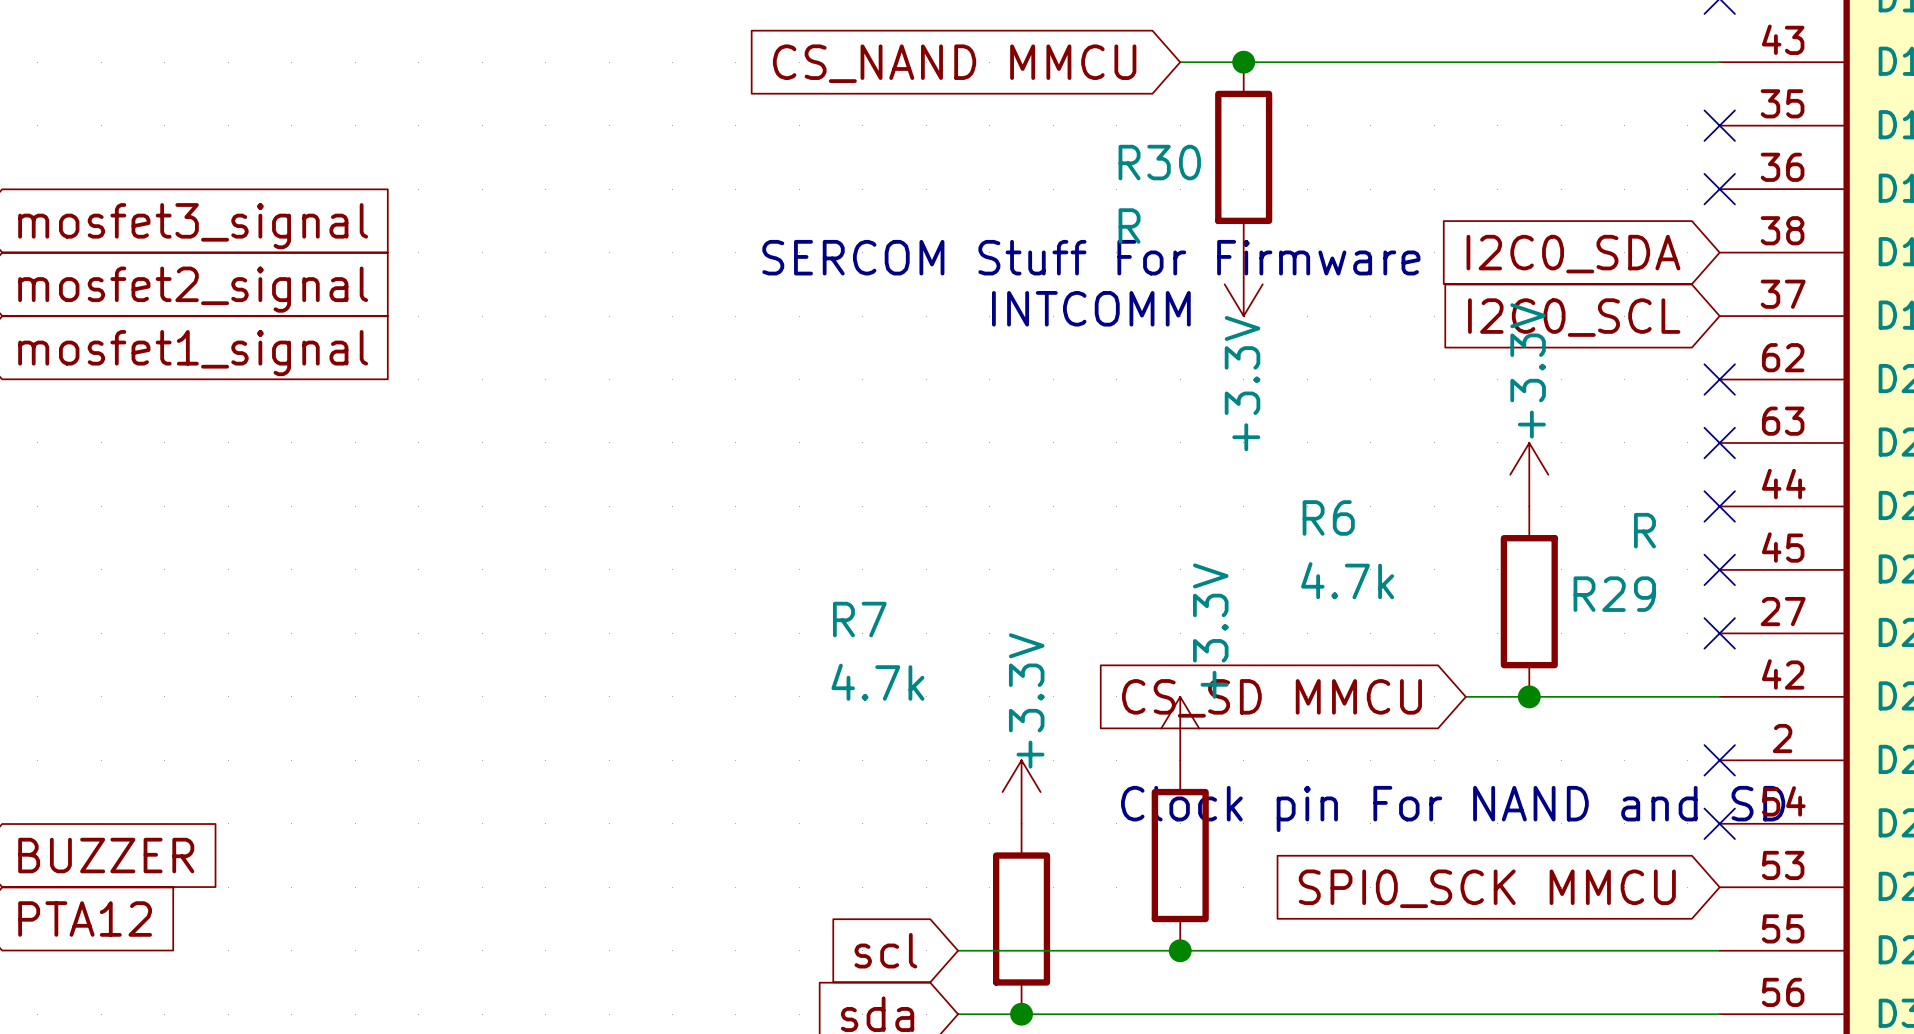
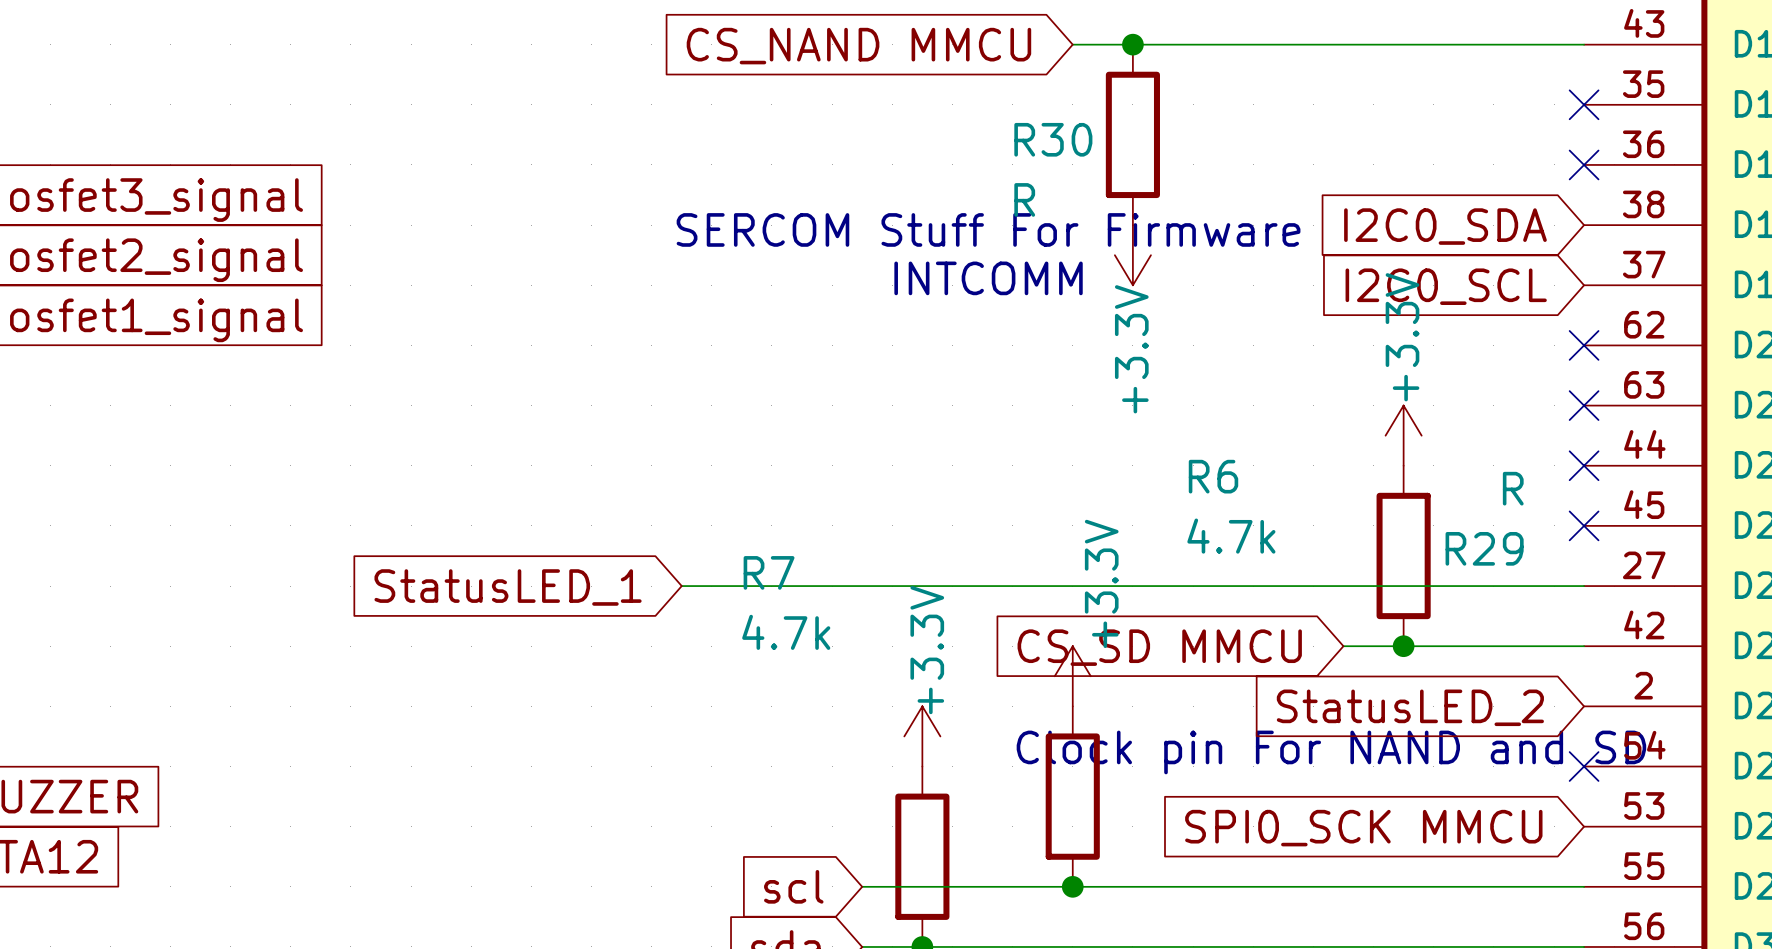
wire: none -> (681, 586) (1584, 586)
no-connect mark: (1719, 633) -> none
global label: none -> StatusLED_1 (508, 587)
no-connect mark: (1719, 760) -> none
global label: none -> StatusLED_2 (1410, 707)

